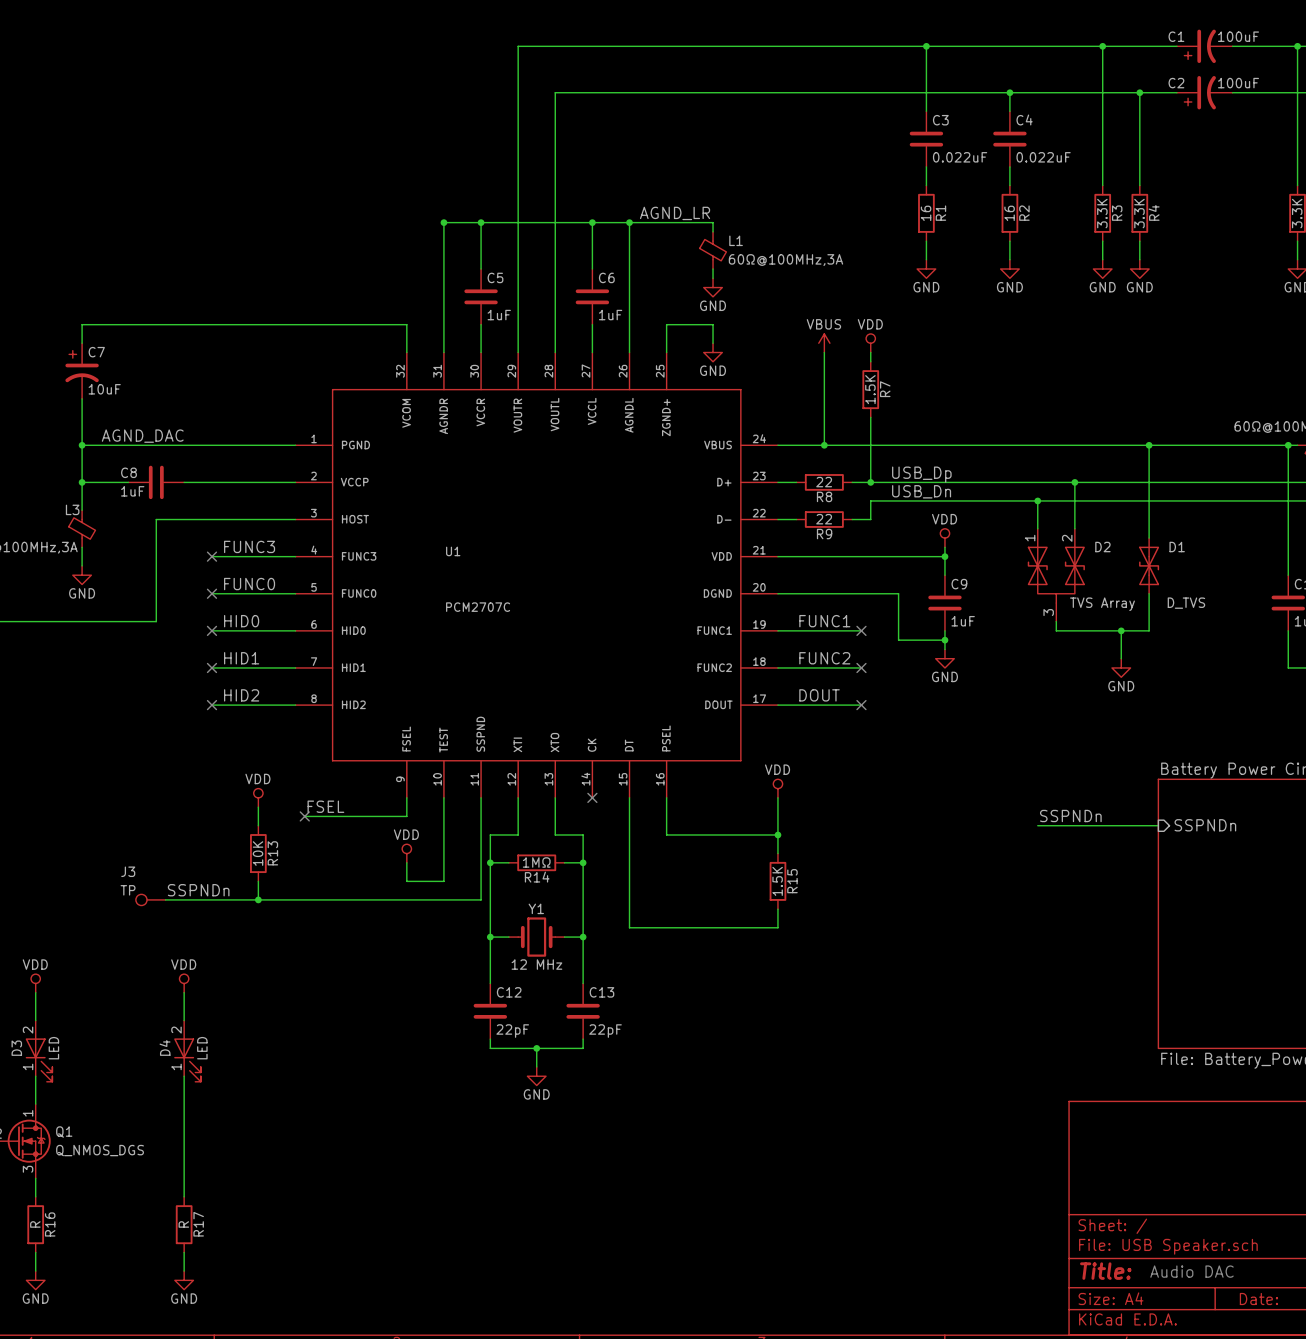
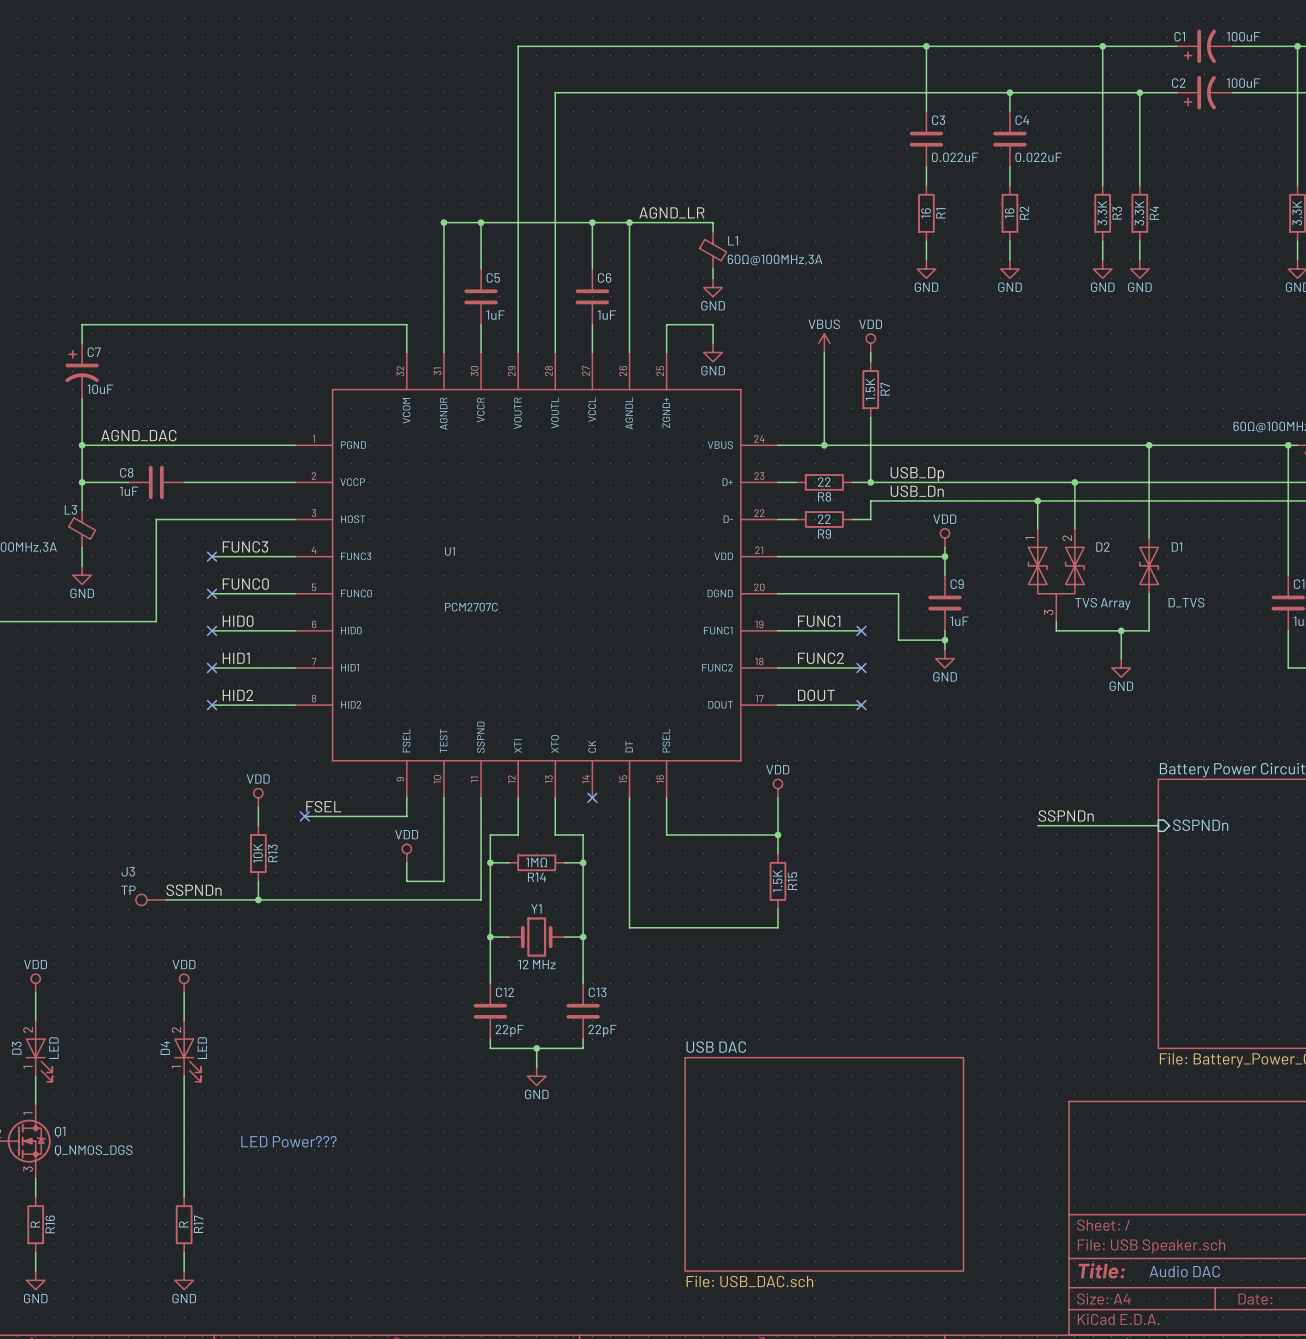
text: none -> LED Power??? (288, 1141)
sheet USB DAC: none -> File: USB_DAC.sch (824, 1164)

